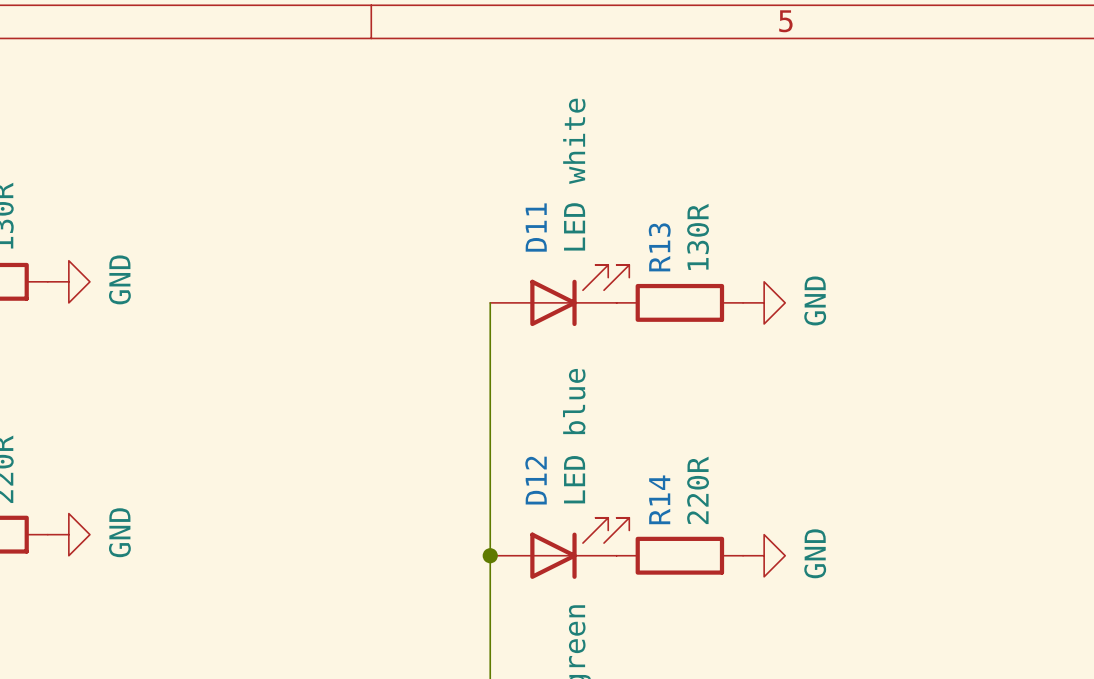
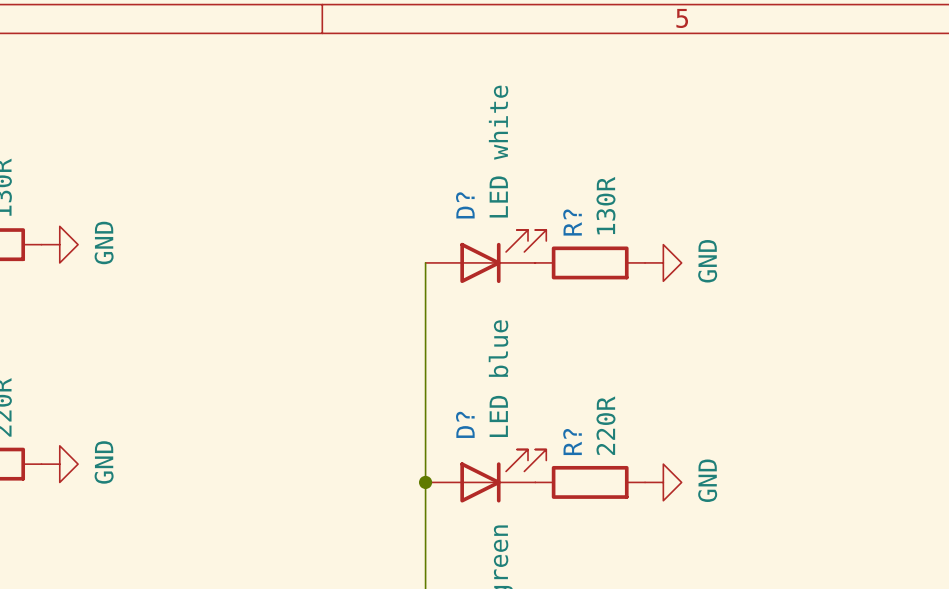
D11 name: D11 (536, 227) -> D? (465, 205)
R13 name: R13 (659, 247) -> R? (572, 222)
D12 name: D12 (536, 480) -> D? (465, 424)
R14 name: R14 (659, 499) -> R? (572, 442)

